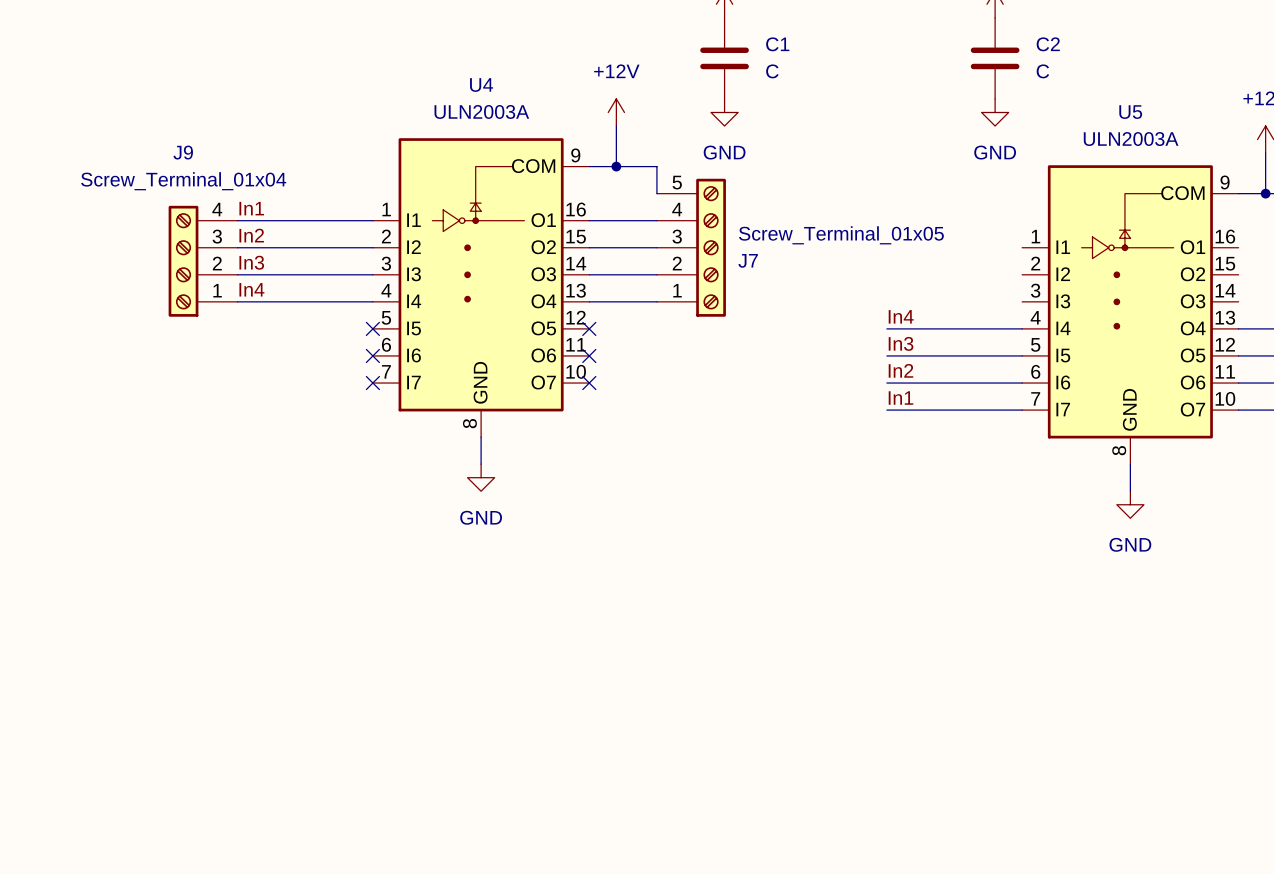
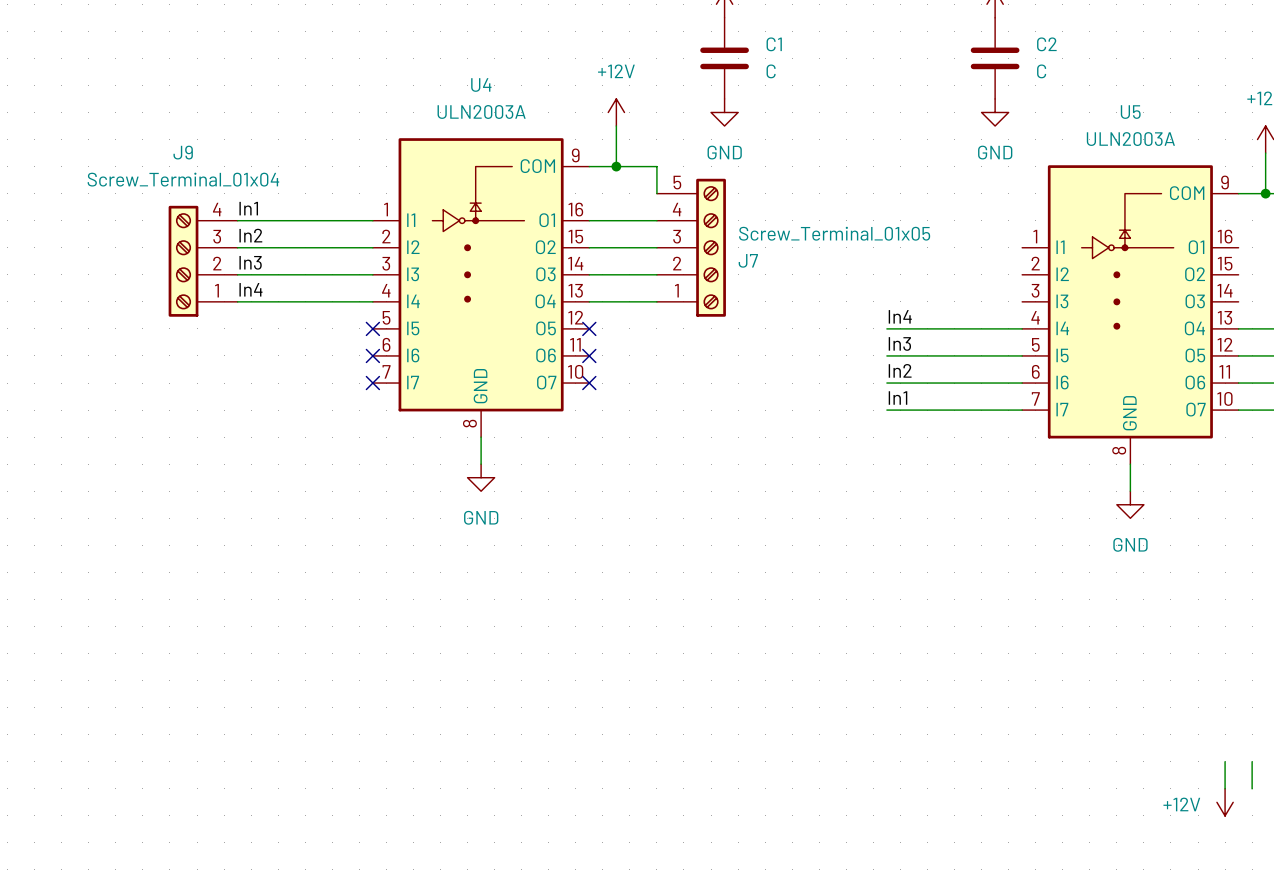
wire: none -> (1225, 761) (1225, 788)
wire: none -> (1252, 761) (1252, 788)
power symbol: none -> +12V (1225, 802)

